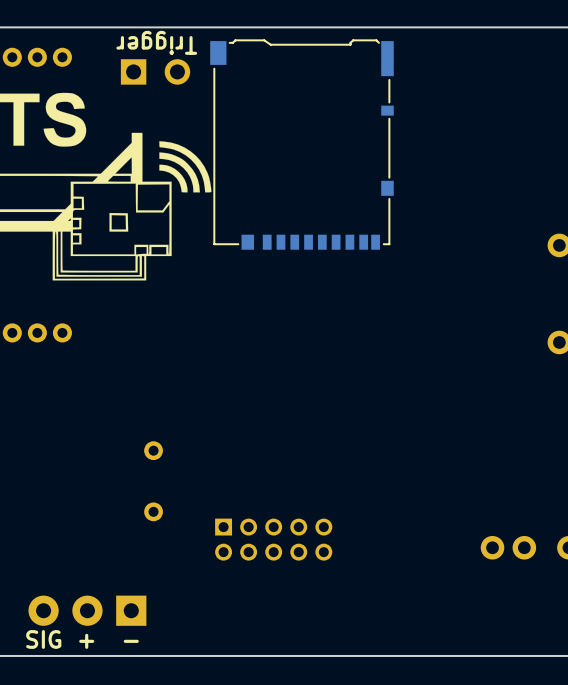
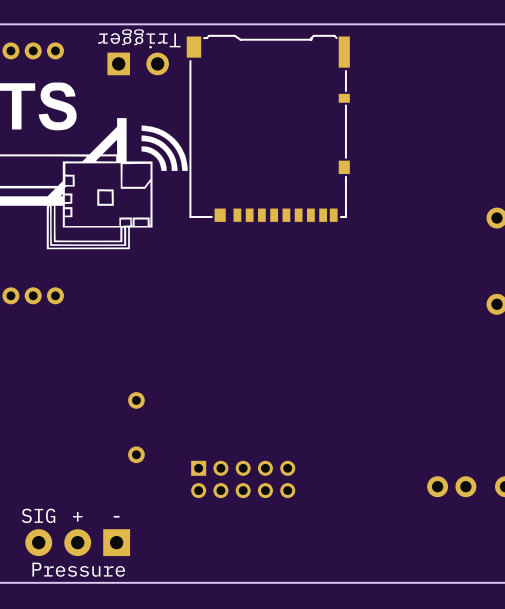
text: none -> + (77, 516)
text position: SIG (43, 639) -> SIG (38, 515)
text: + (86, 641) -> Pressure (78, 569)
text position: - (131, 641) -> - (116, 516)

